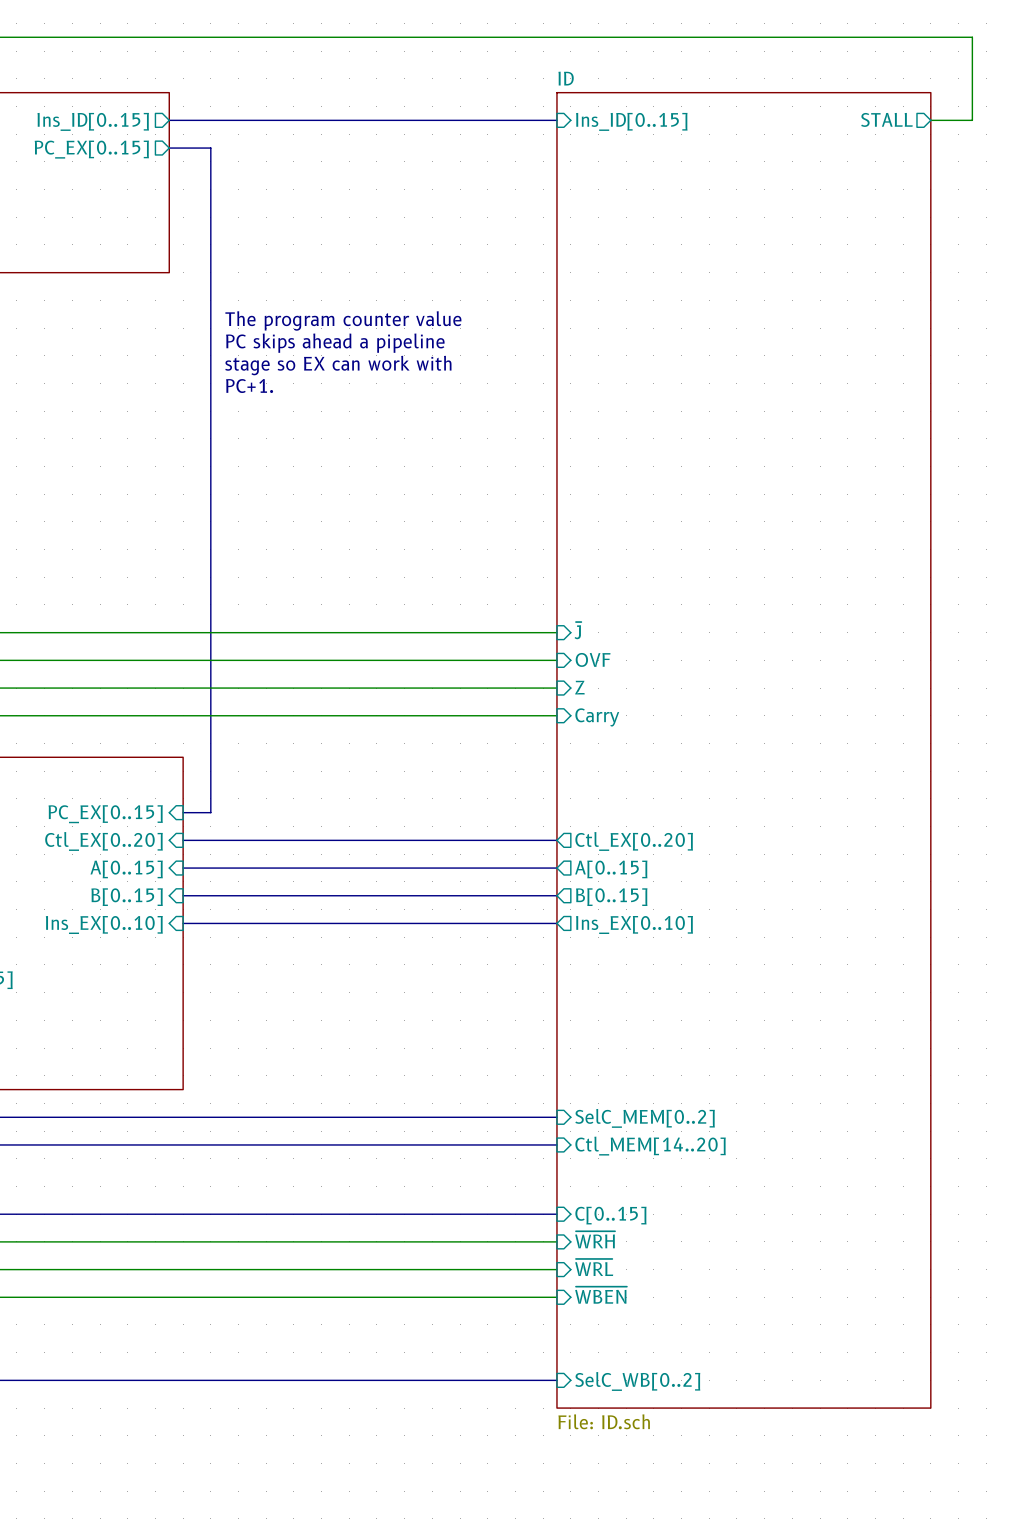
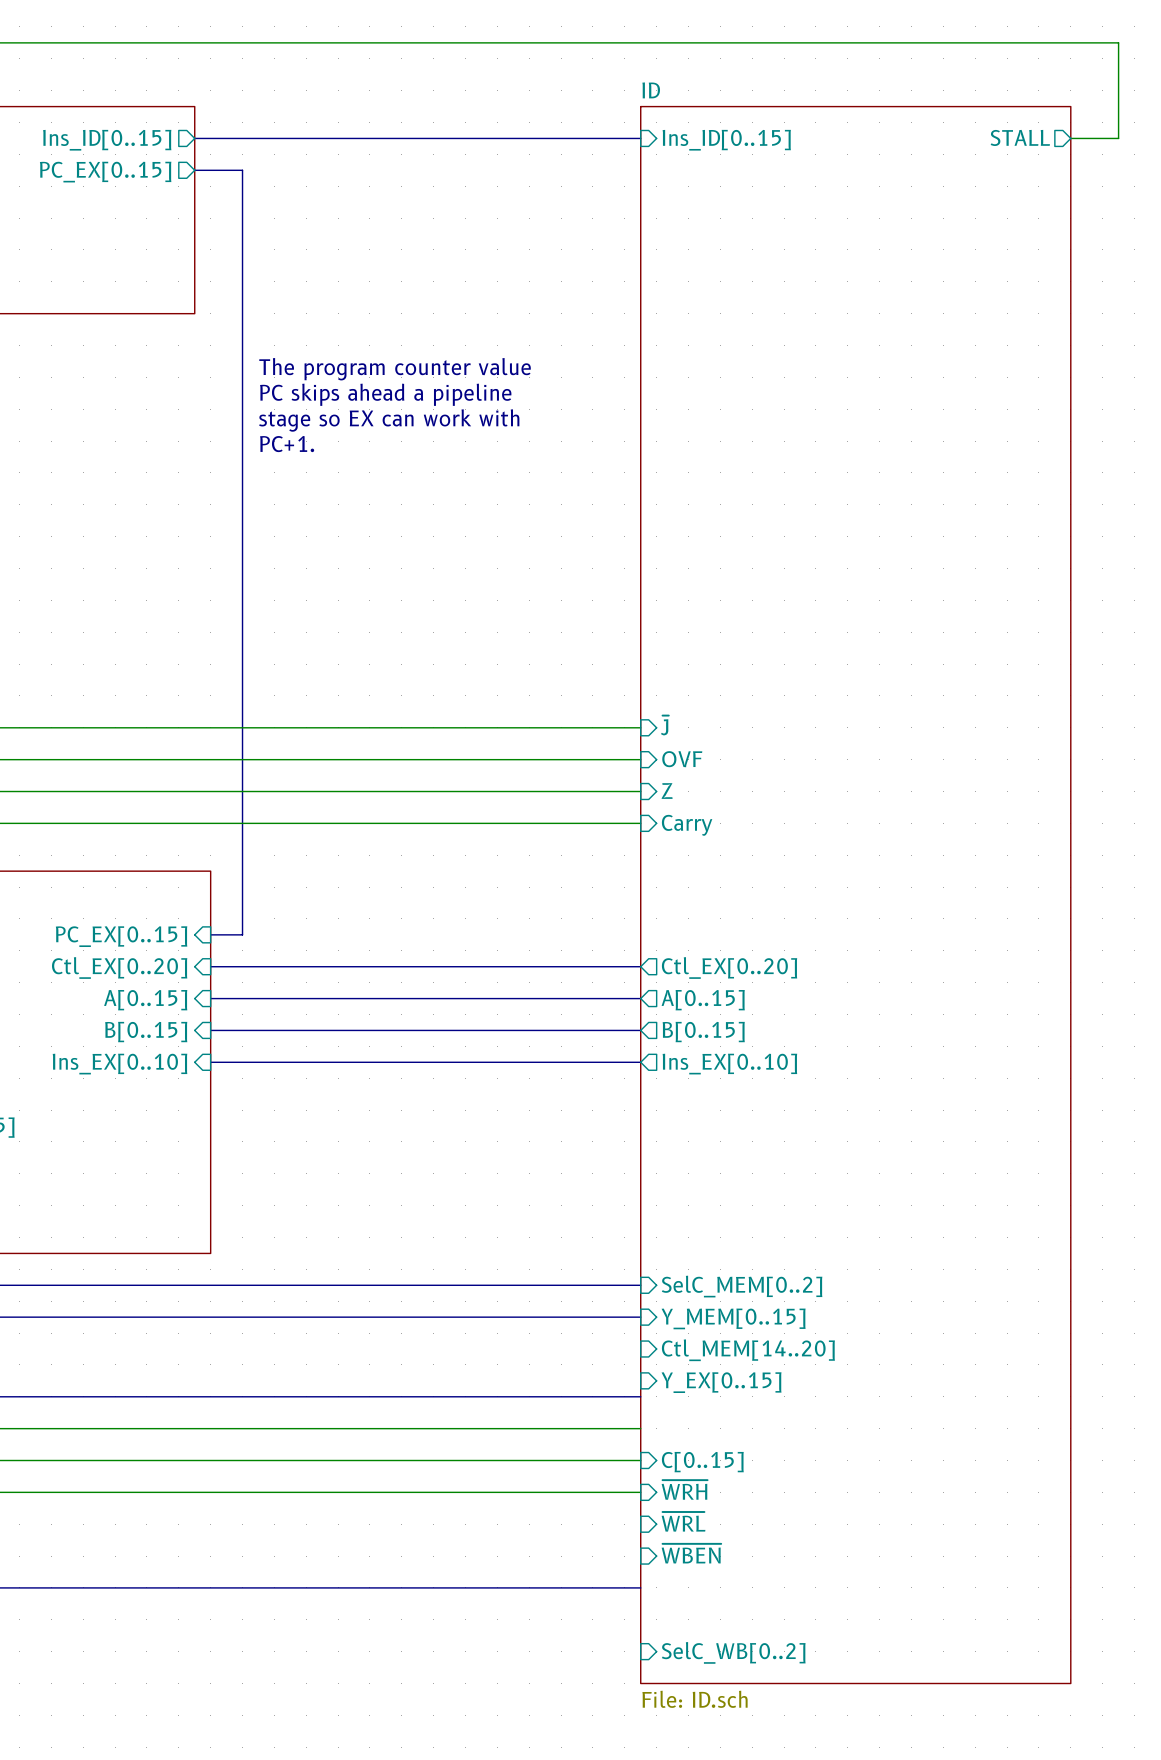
sheet ID: File: ID.sch (743, 750) -> none
sheet ID: none -> File: ID.sch (855, 895)
sheet pin: Ctl_MEM[14..20] (650, 1146) -> Y_MEM[0..15] (733, 1318)
sheet pin: none -> Ctl_MEM[14..20] (748, 1350)
sheet pin: C[0..15] (610, 1215) -> Y_EX[0..15] (721, 1382)
sheet pin: ~{WRH} (595, 1239) -> none
sheet pin: ~{WRL} (594, 1267) -> C[0..15] (702, 1462)
sheet pin: ~{WBEN} (601, 1295) -> ~{WRH} (684, 1489)
sheet pin: none -> ~{WRL} (683, 1521)
sheet pin: none -> ~{WBEN} (691, 1553)
sheet pin position: SelC_WB[0..2] (637, 1381) -> SelC_WB[0..2] (733, 1652)

